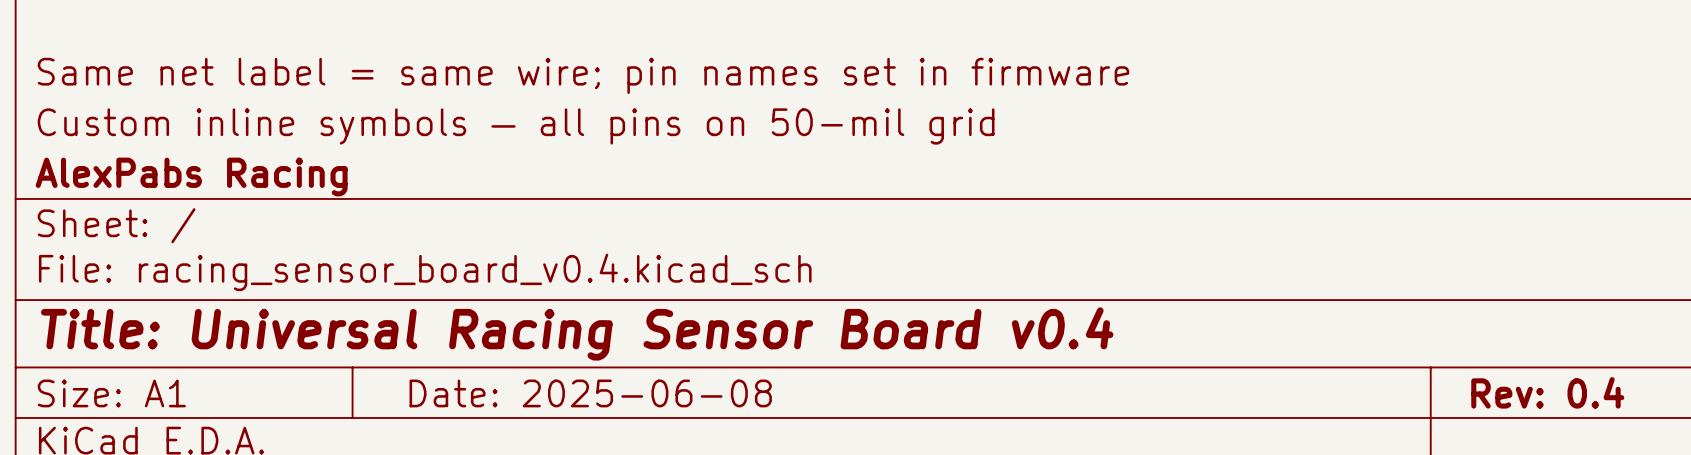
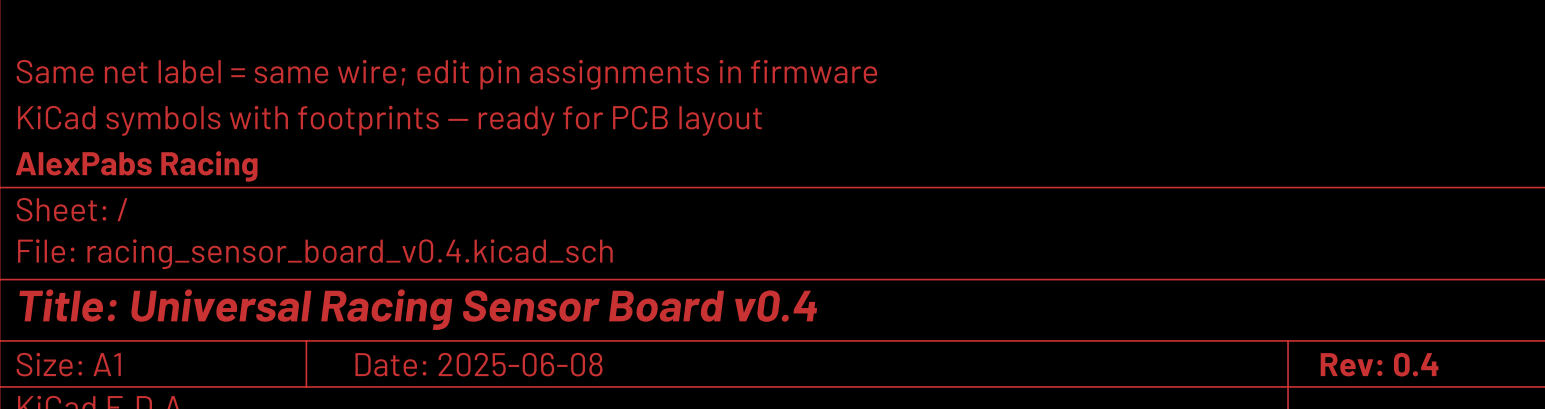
title block: Same net label = same wire; pin names set in firmware (583, 75) -> Same net label = same wire; edit pin assignments in firmware (446, 74)
title block: Custom inline symbols — all pins on 50-mil grid (516, 126) -> KiCad symbols with footprints — ready for PCB layout (389, 120)

